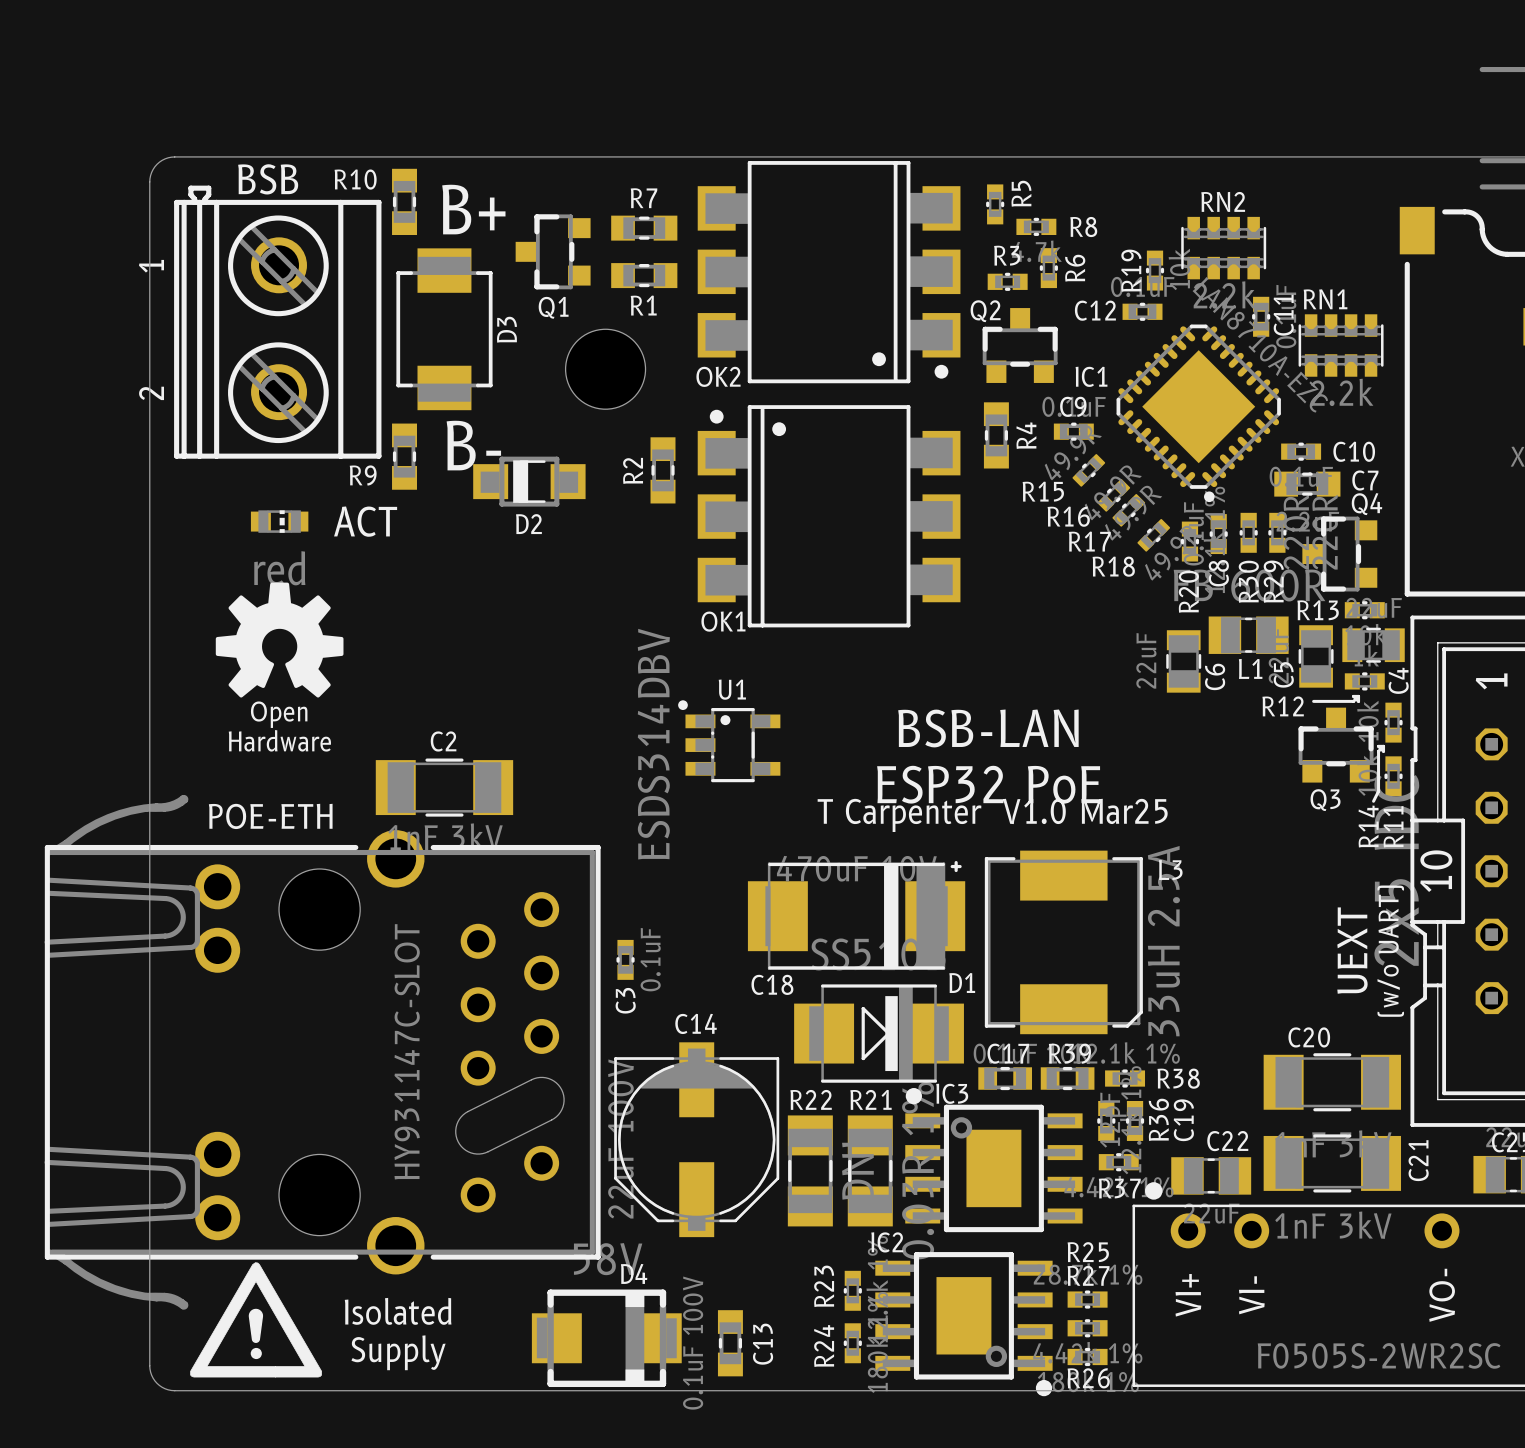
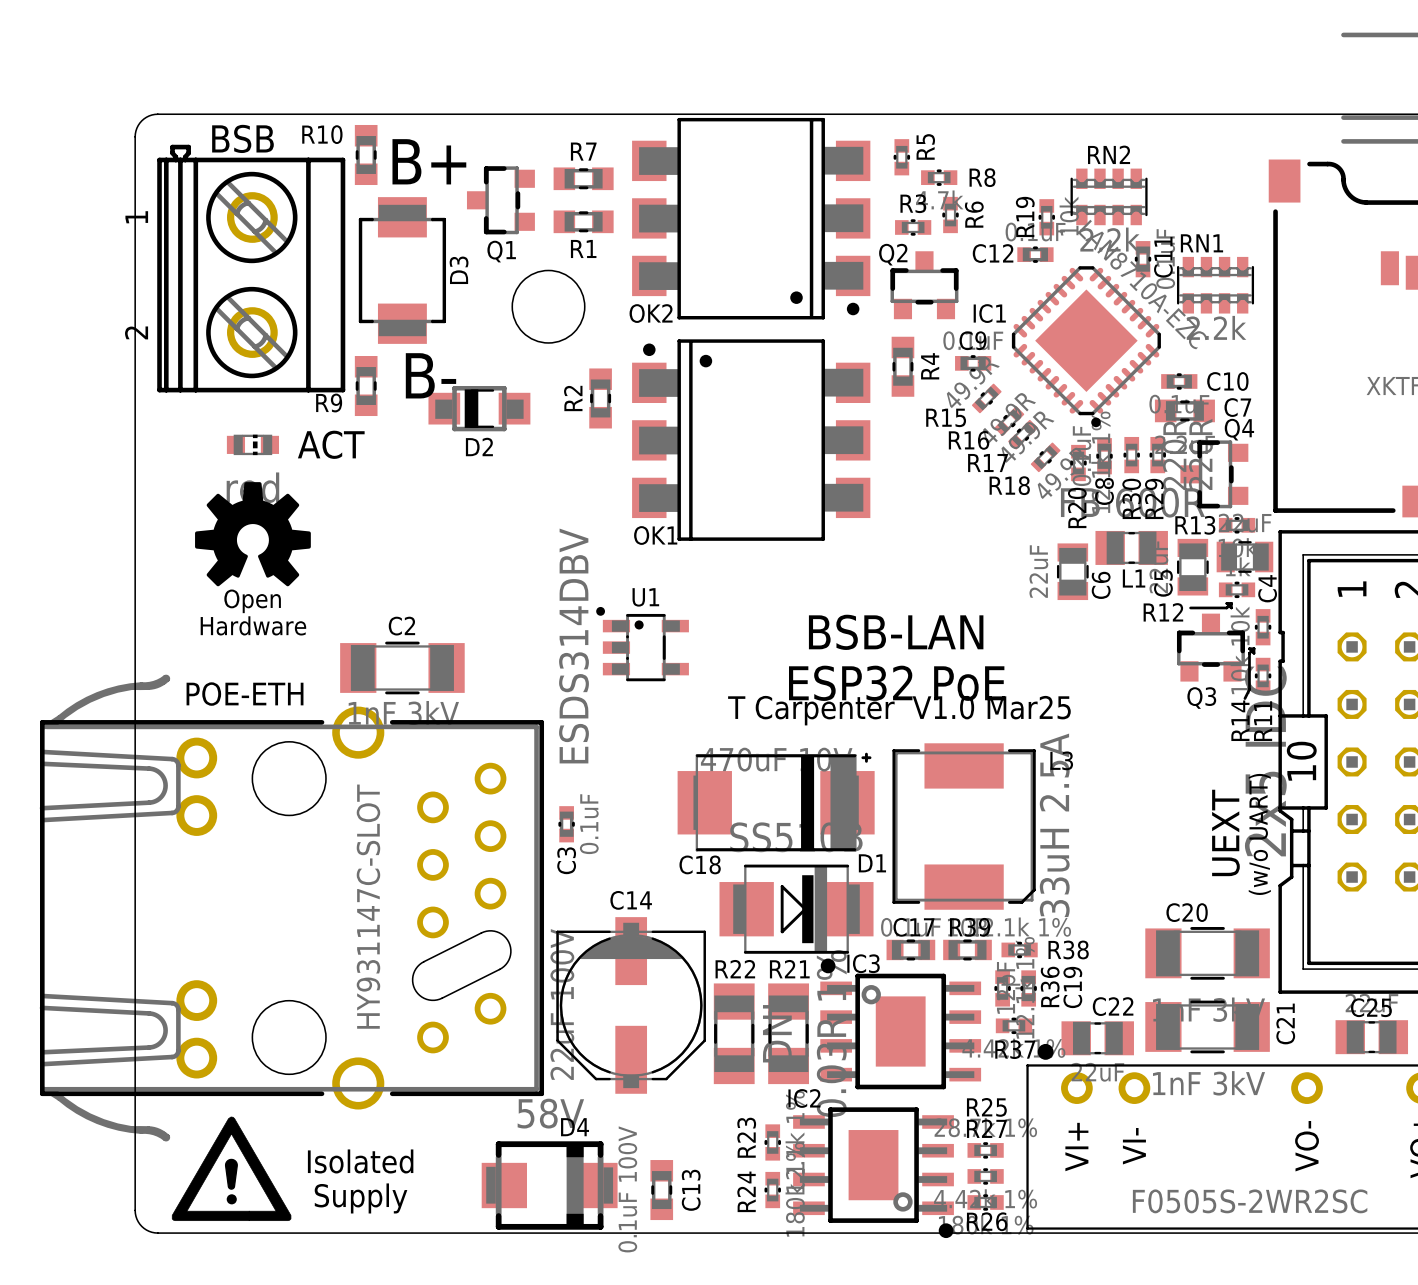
BSB footprint: [174, 185, 382, 459] -> [157, 144, 346, 393]
drawing position: (279, 640) -> (252, 534)
text position: Open (279, 714) -> Open (252, 601)
text position: Hardware (279, 740) -> Hardware (253, 625)
U1 position: (729, 741) -> (642, 644)
C2 position: (444, 787) -> (402, 667)
C3 position: (625, 959) -> (566, 824)
POE-ETH position: (322, 1052) -> (291, 908)

